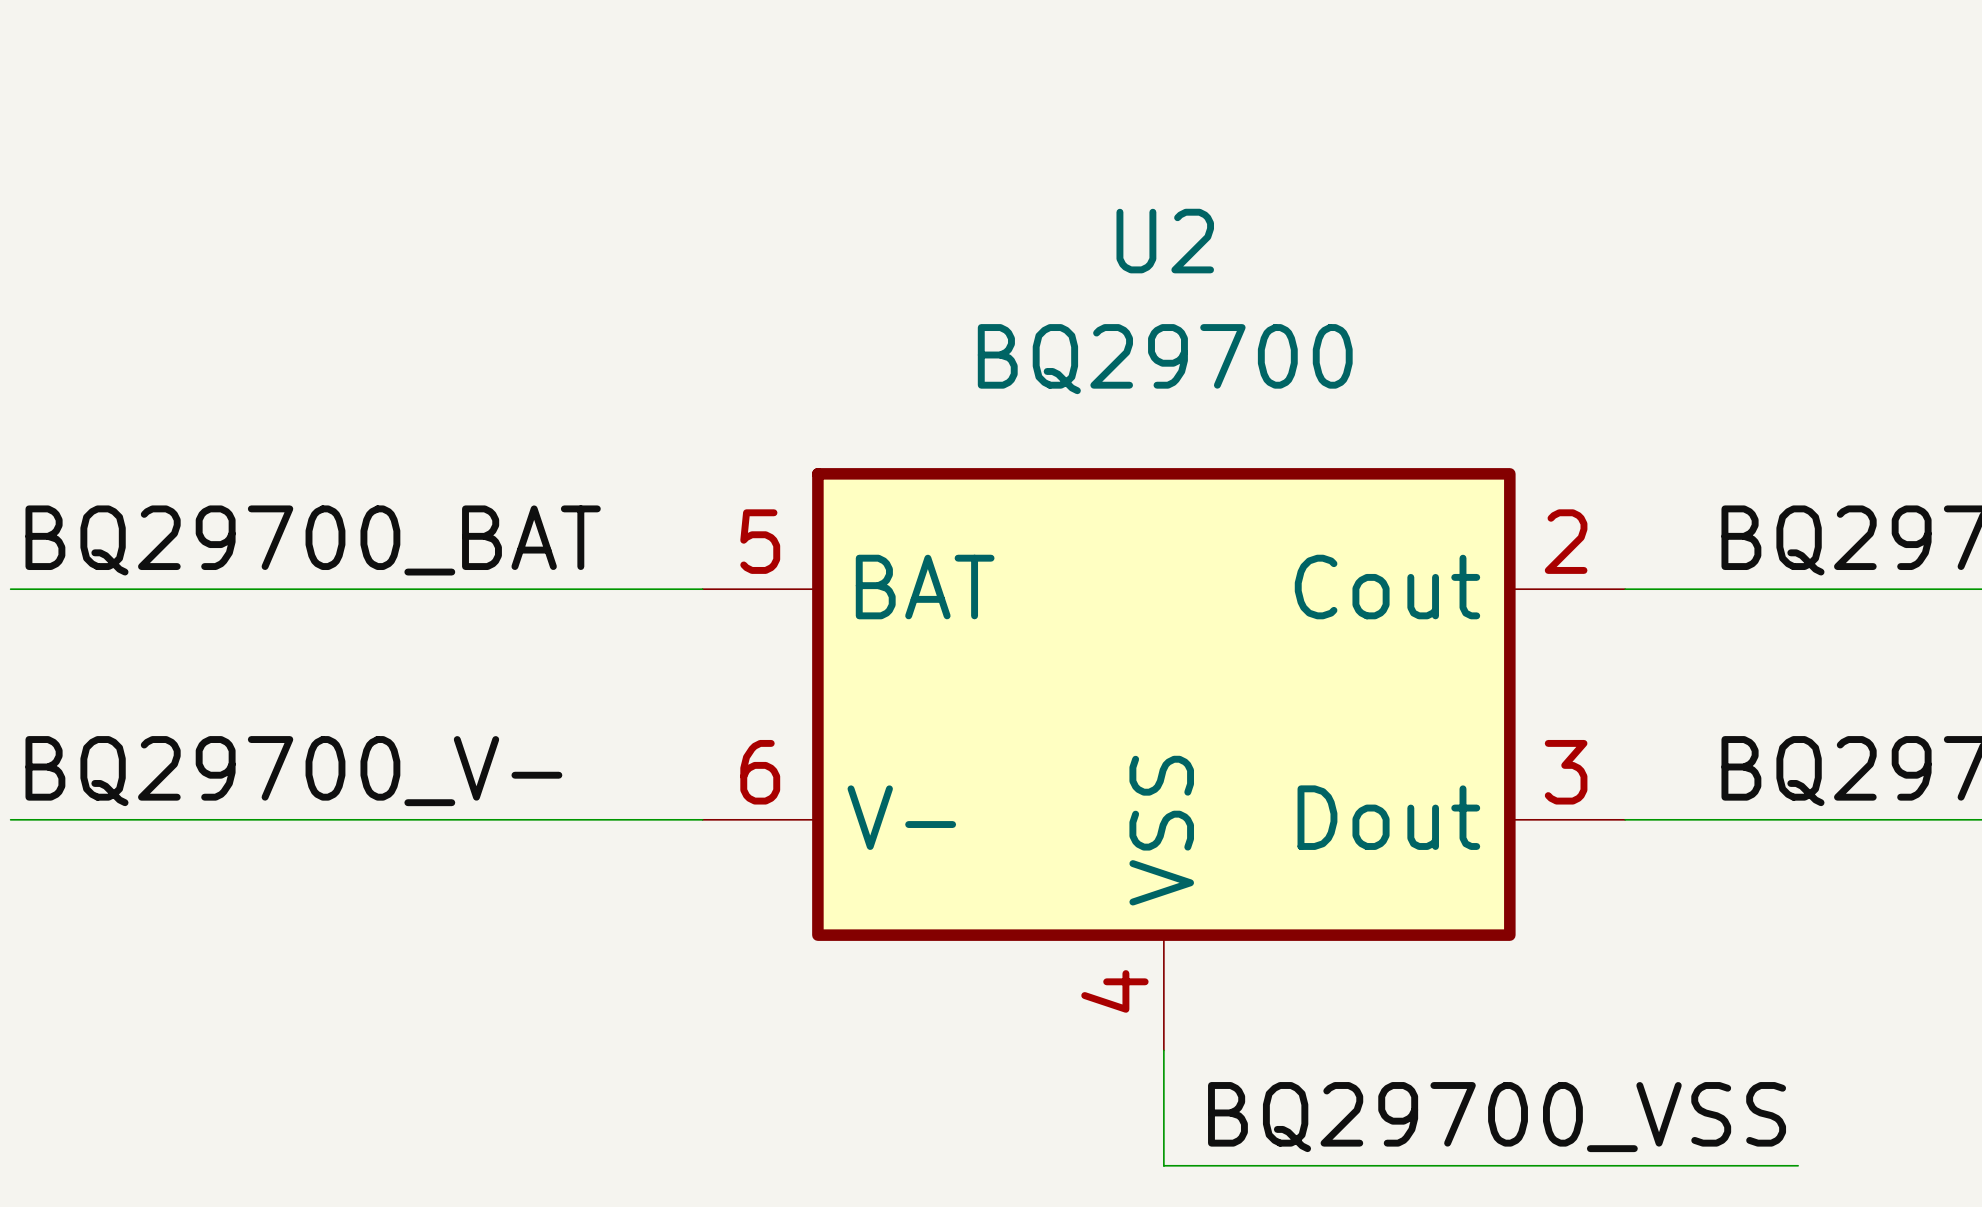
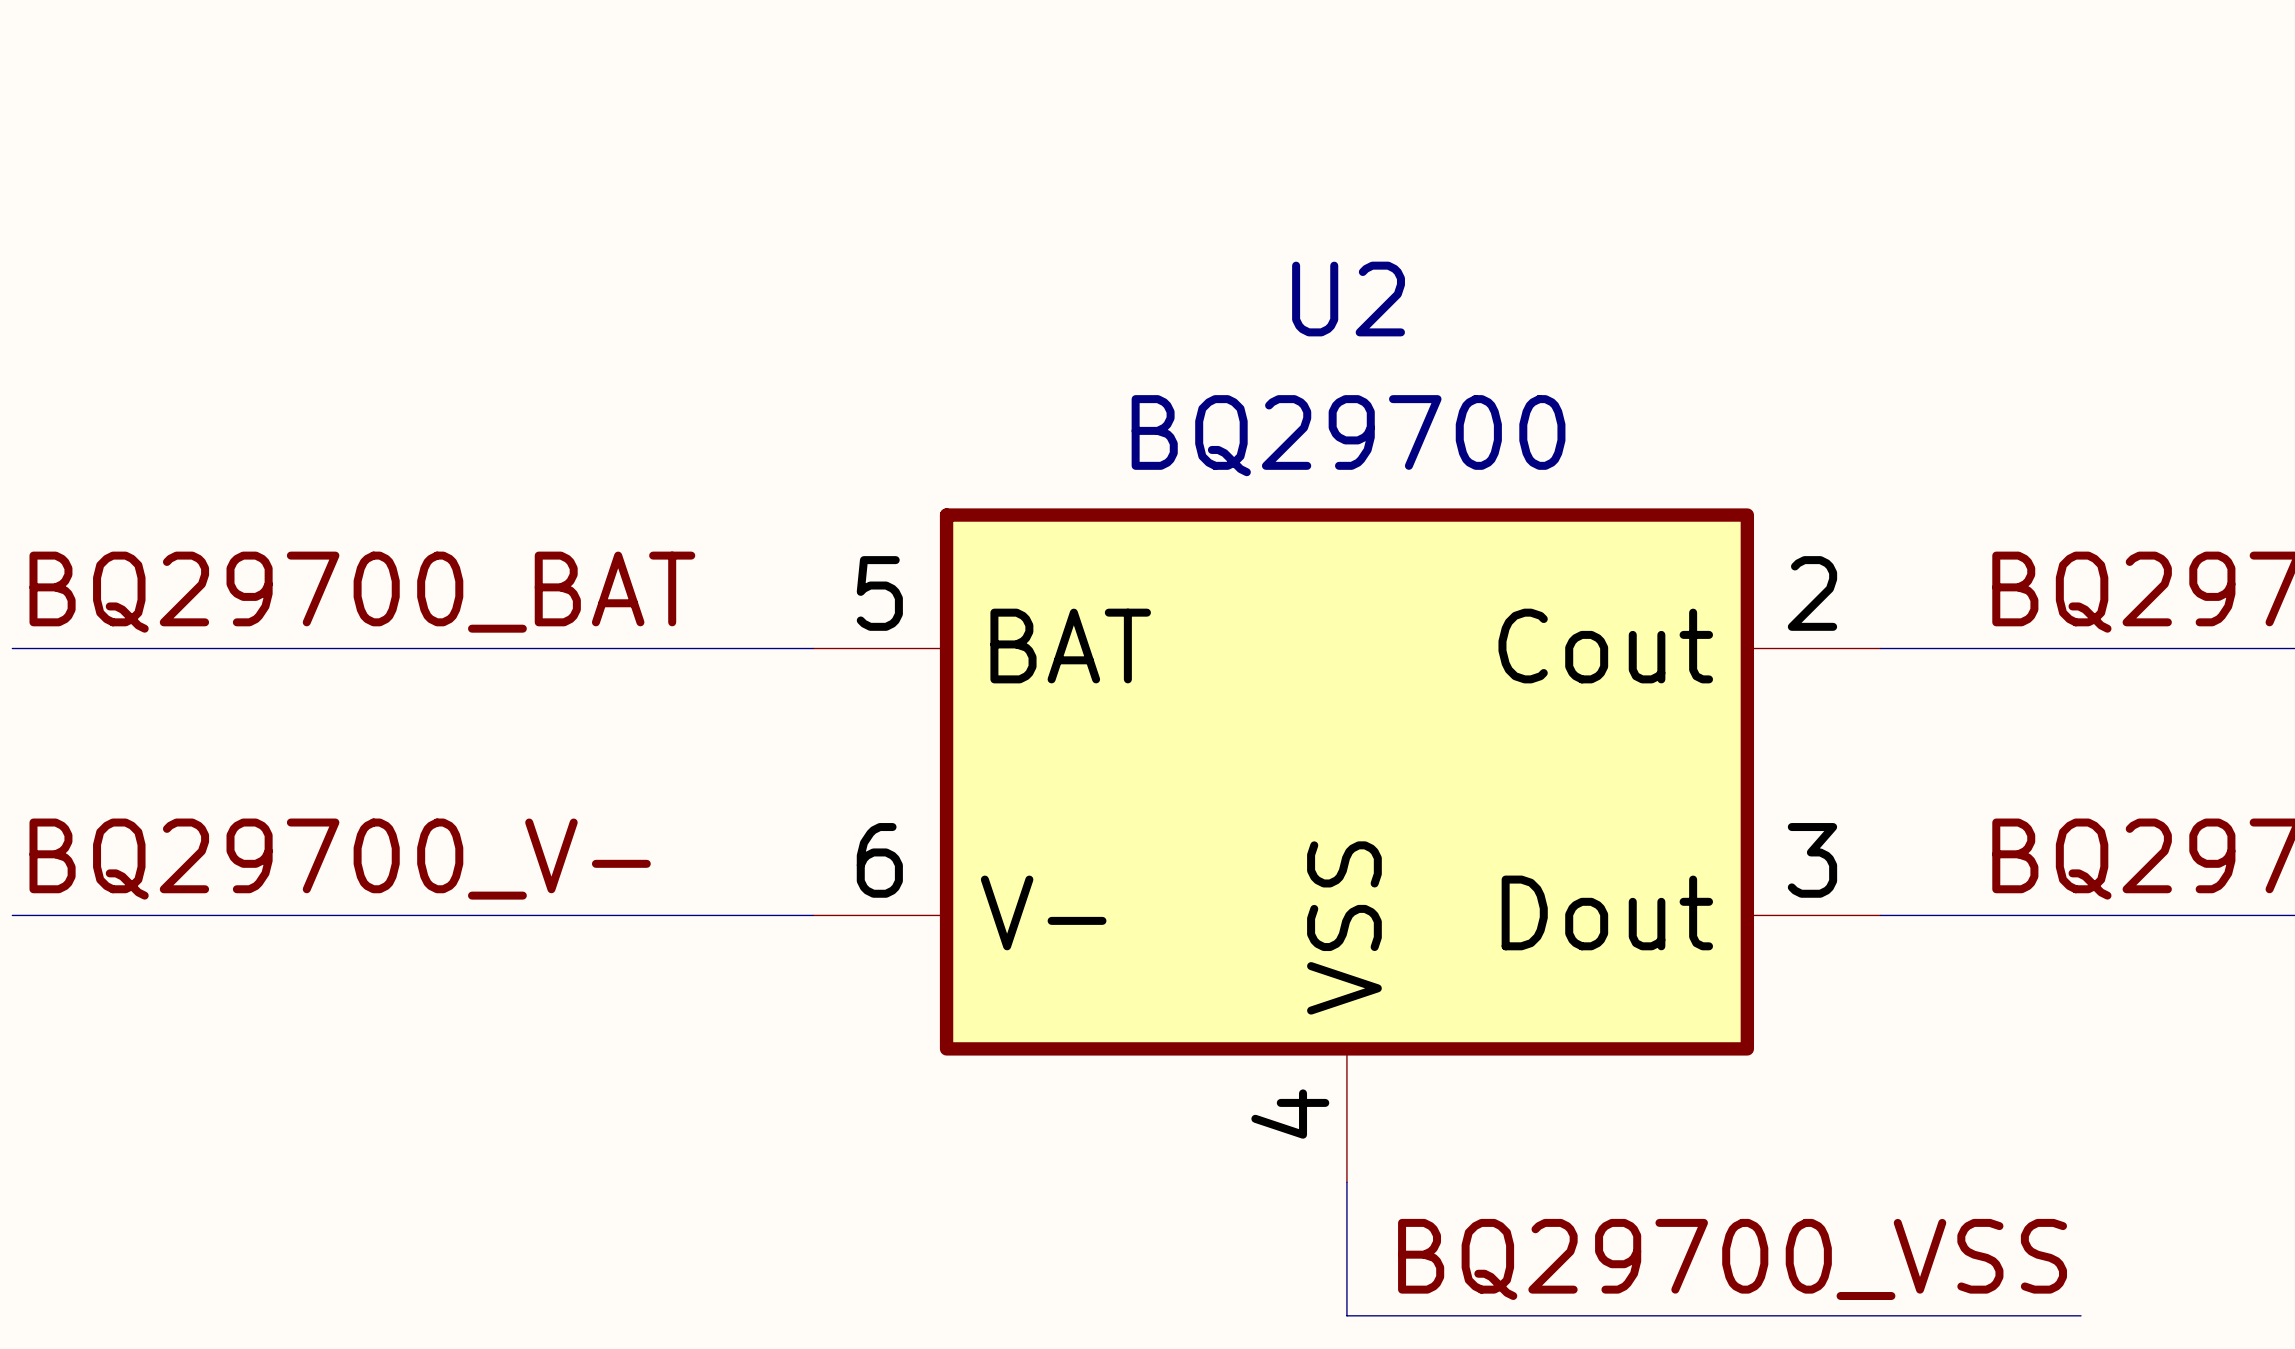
U2 name position: U2 (1165, 241) -> U2 (1348, 299)
U2 value position: BQ29700 (1165, 359) -> BQ29700 (1348, 435)

